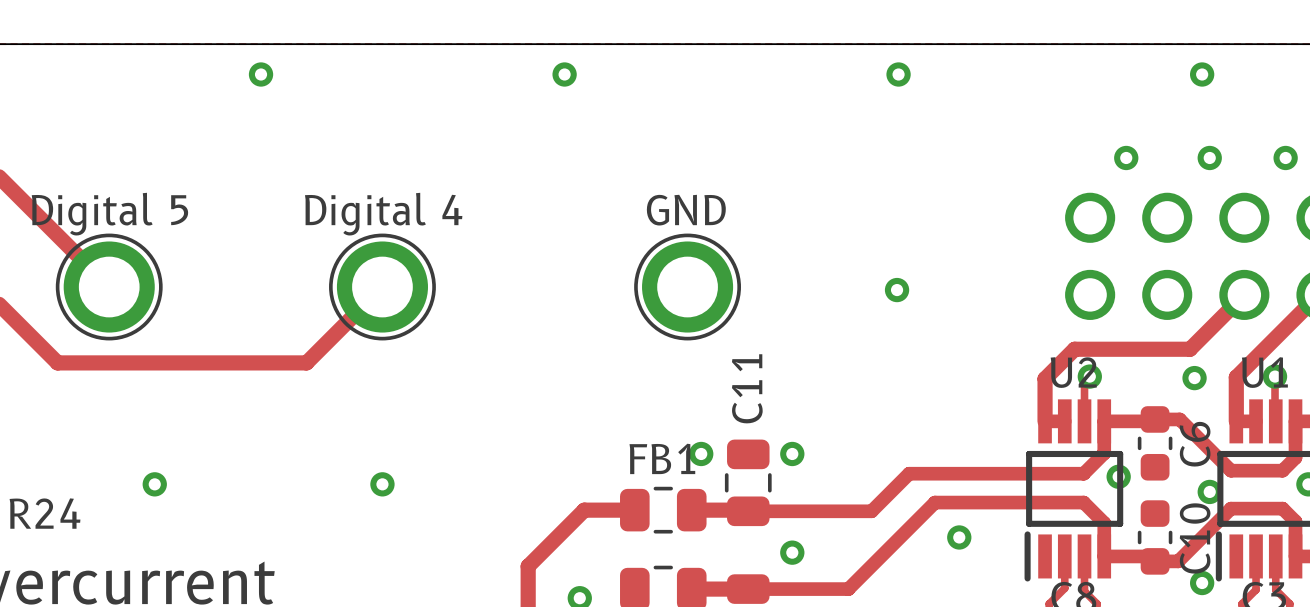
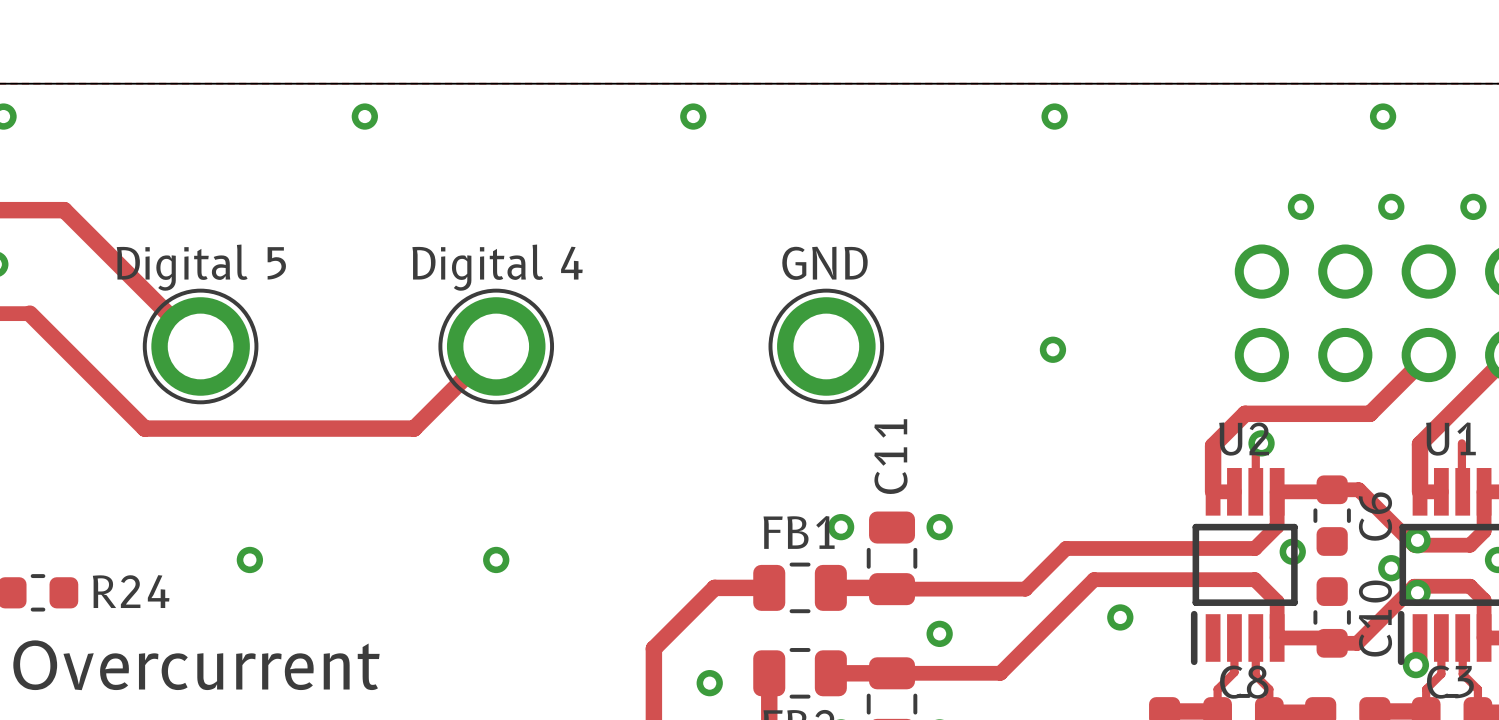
via: (1275, 376) -> none
via: (1194, 378) -> none
via: none -> (1417, 540)
via: none -> (1417, 592)
via position: (1202, 583) -> (1415, 665)

